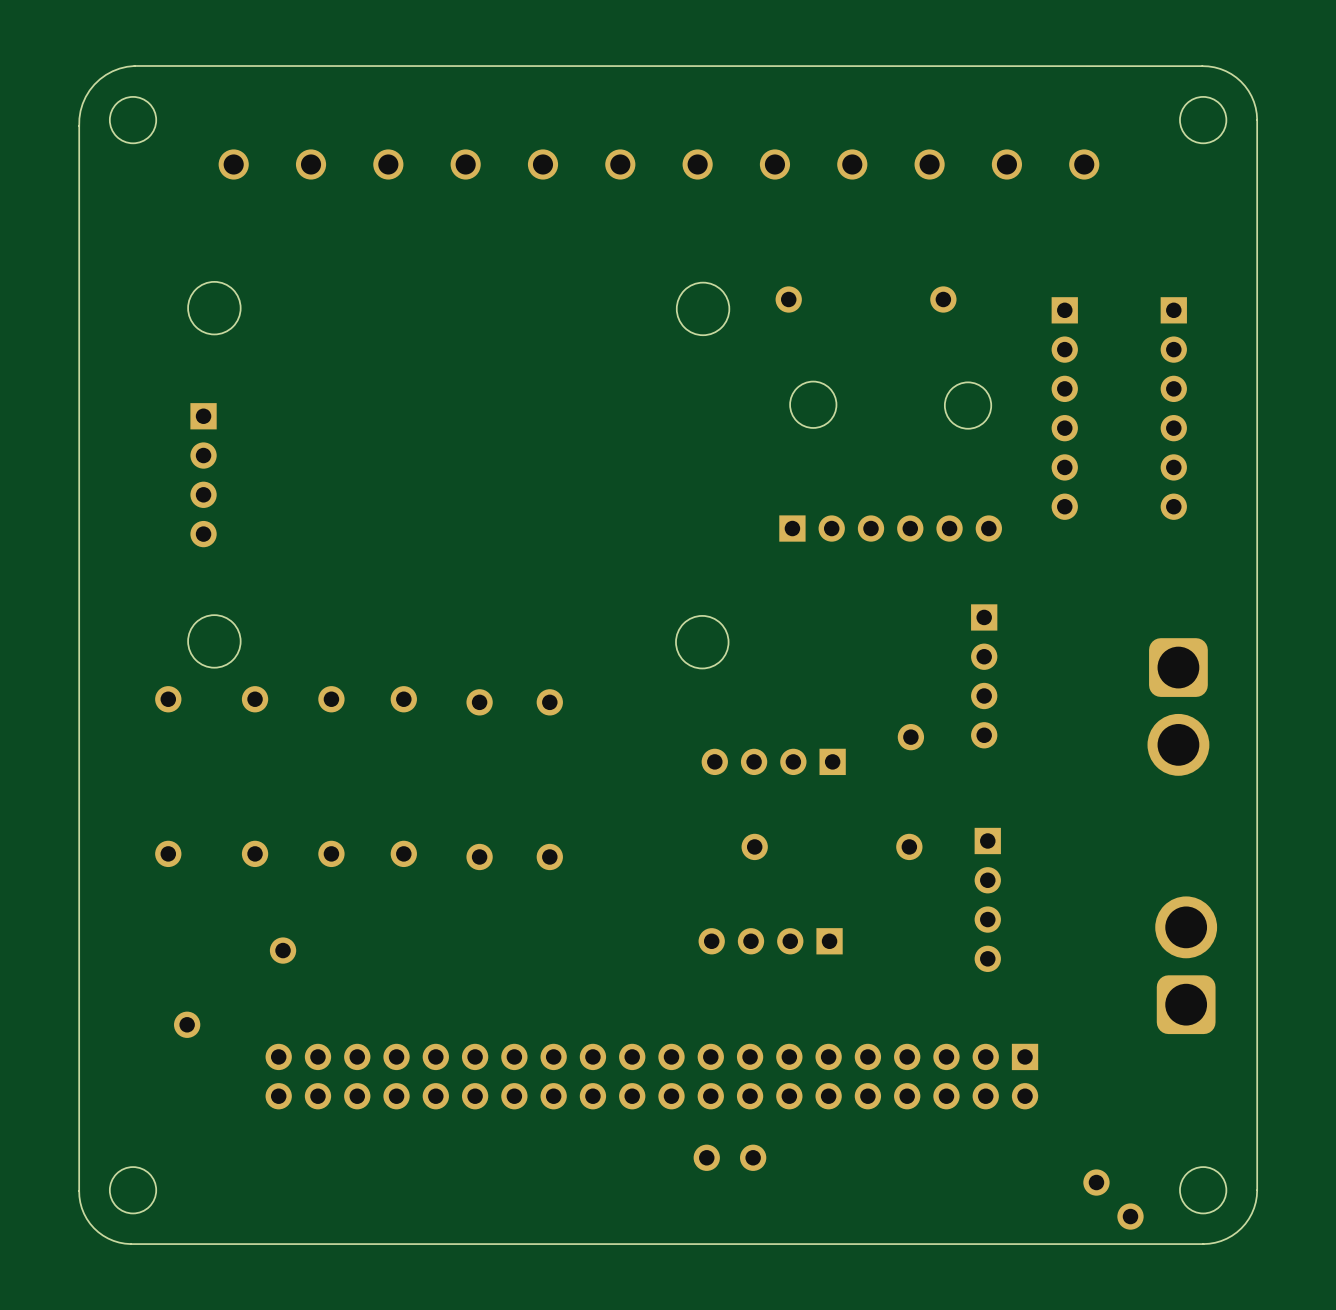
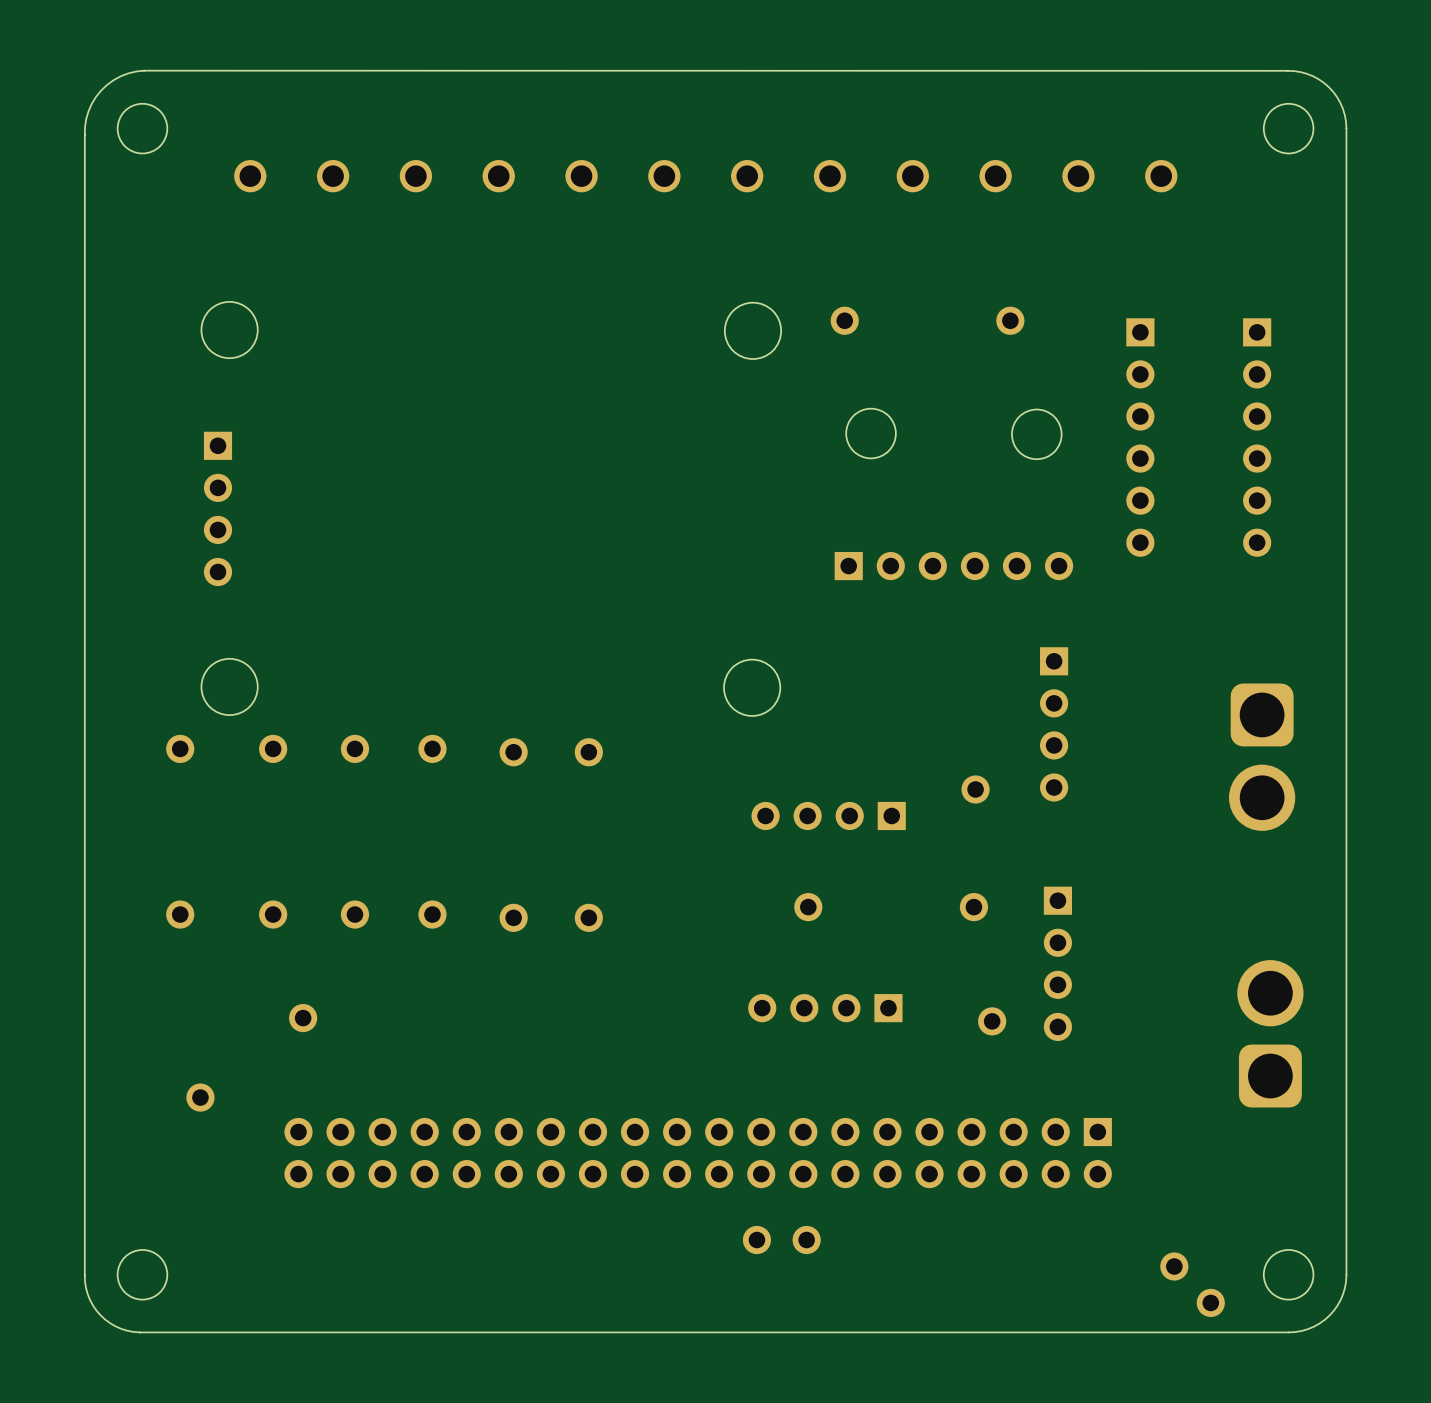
part: none -> (992, 1021)

